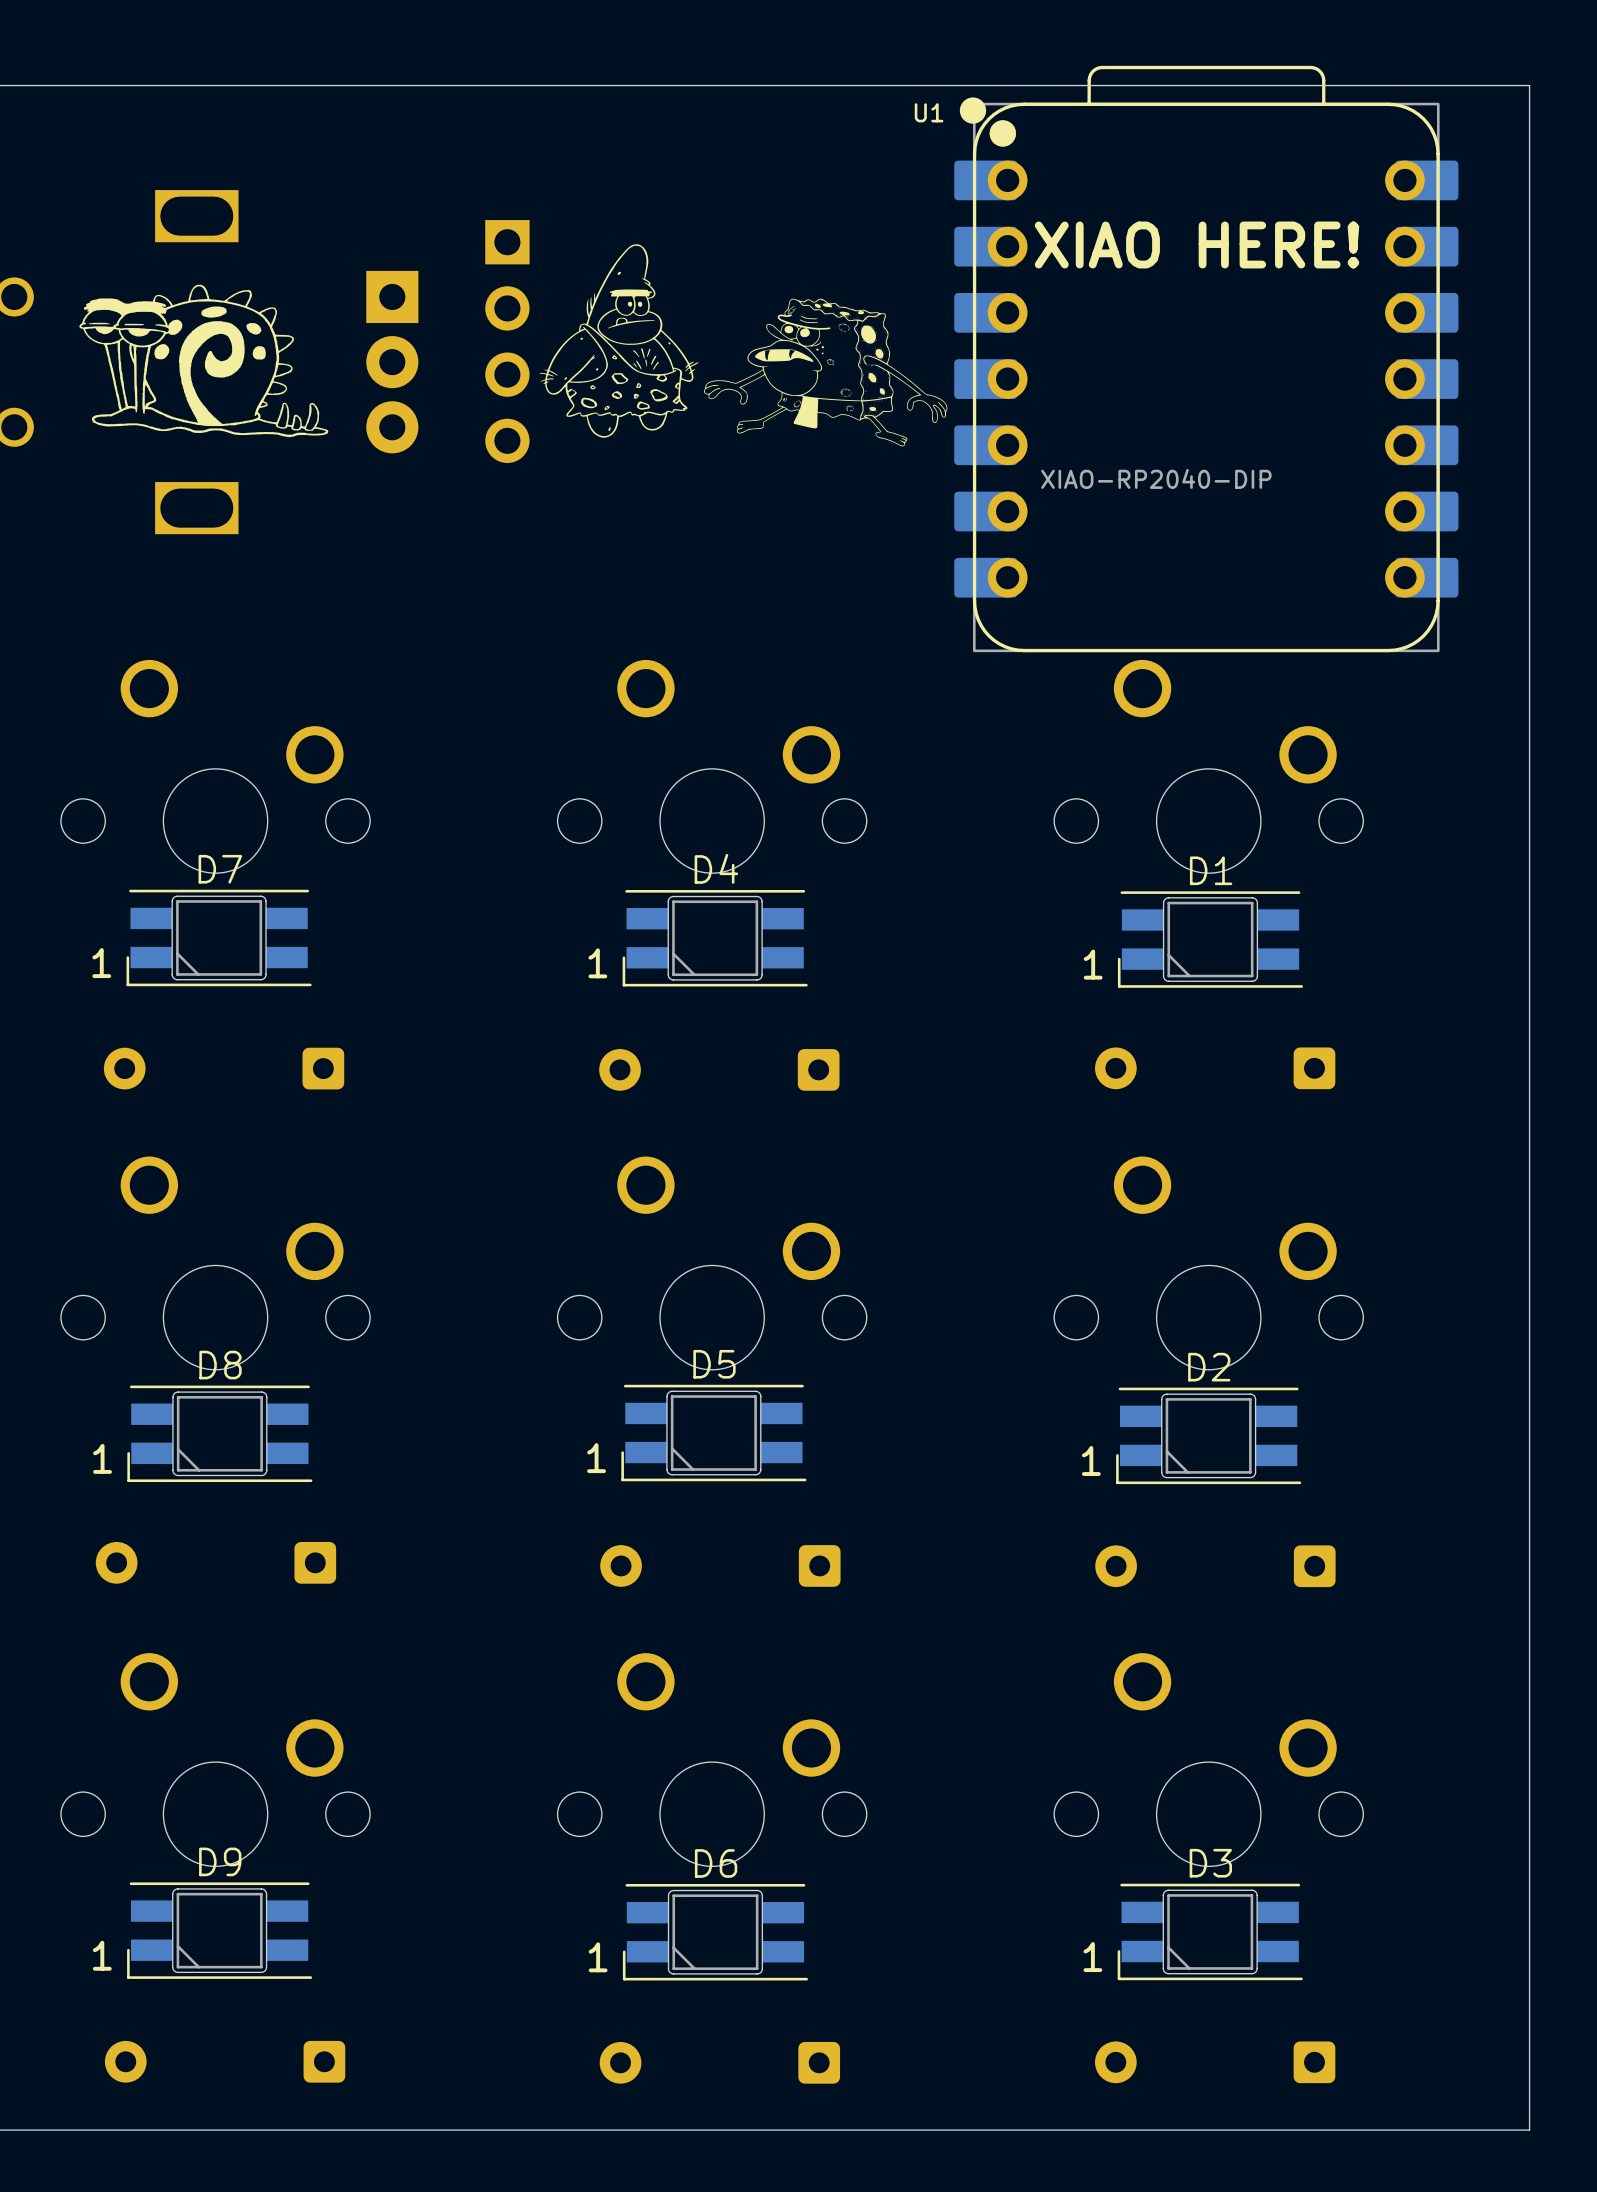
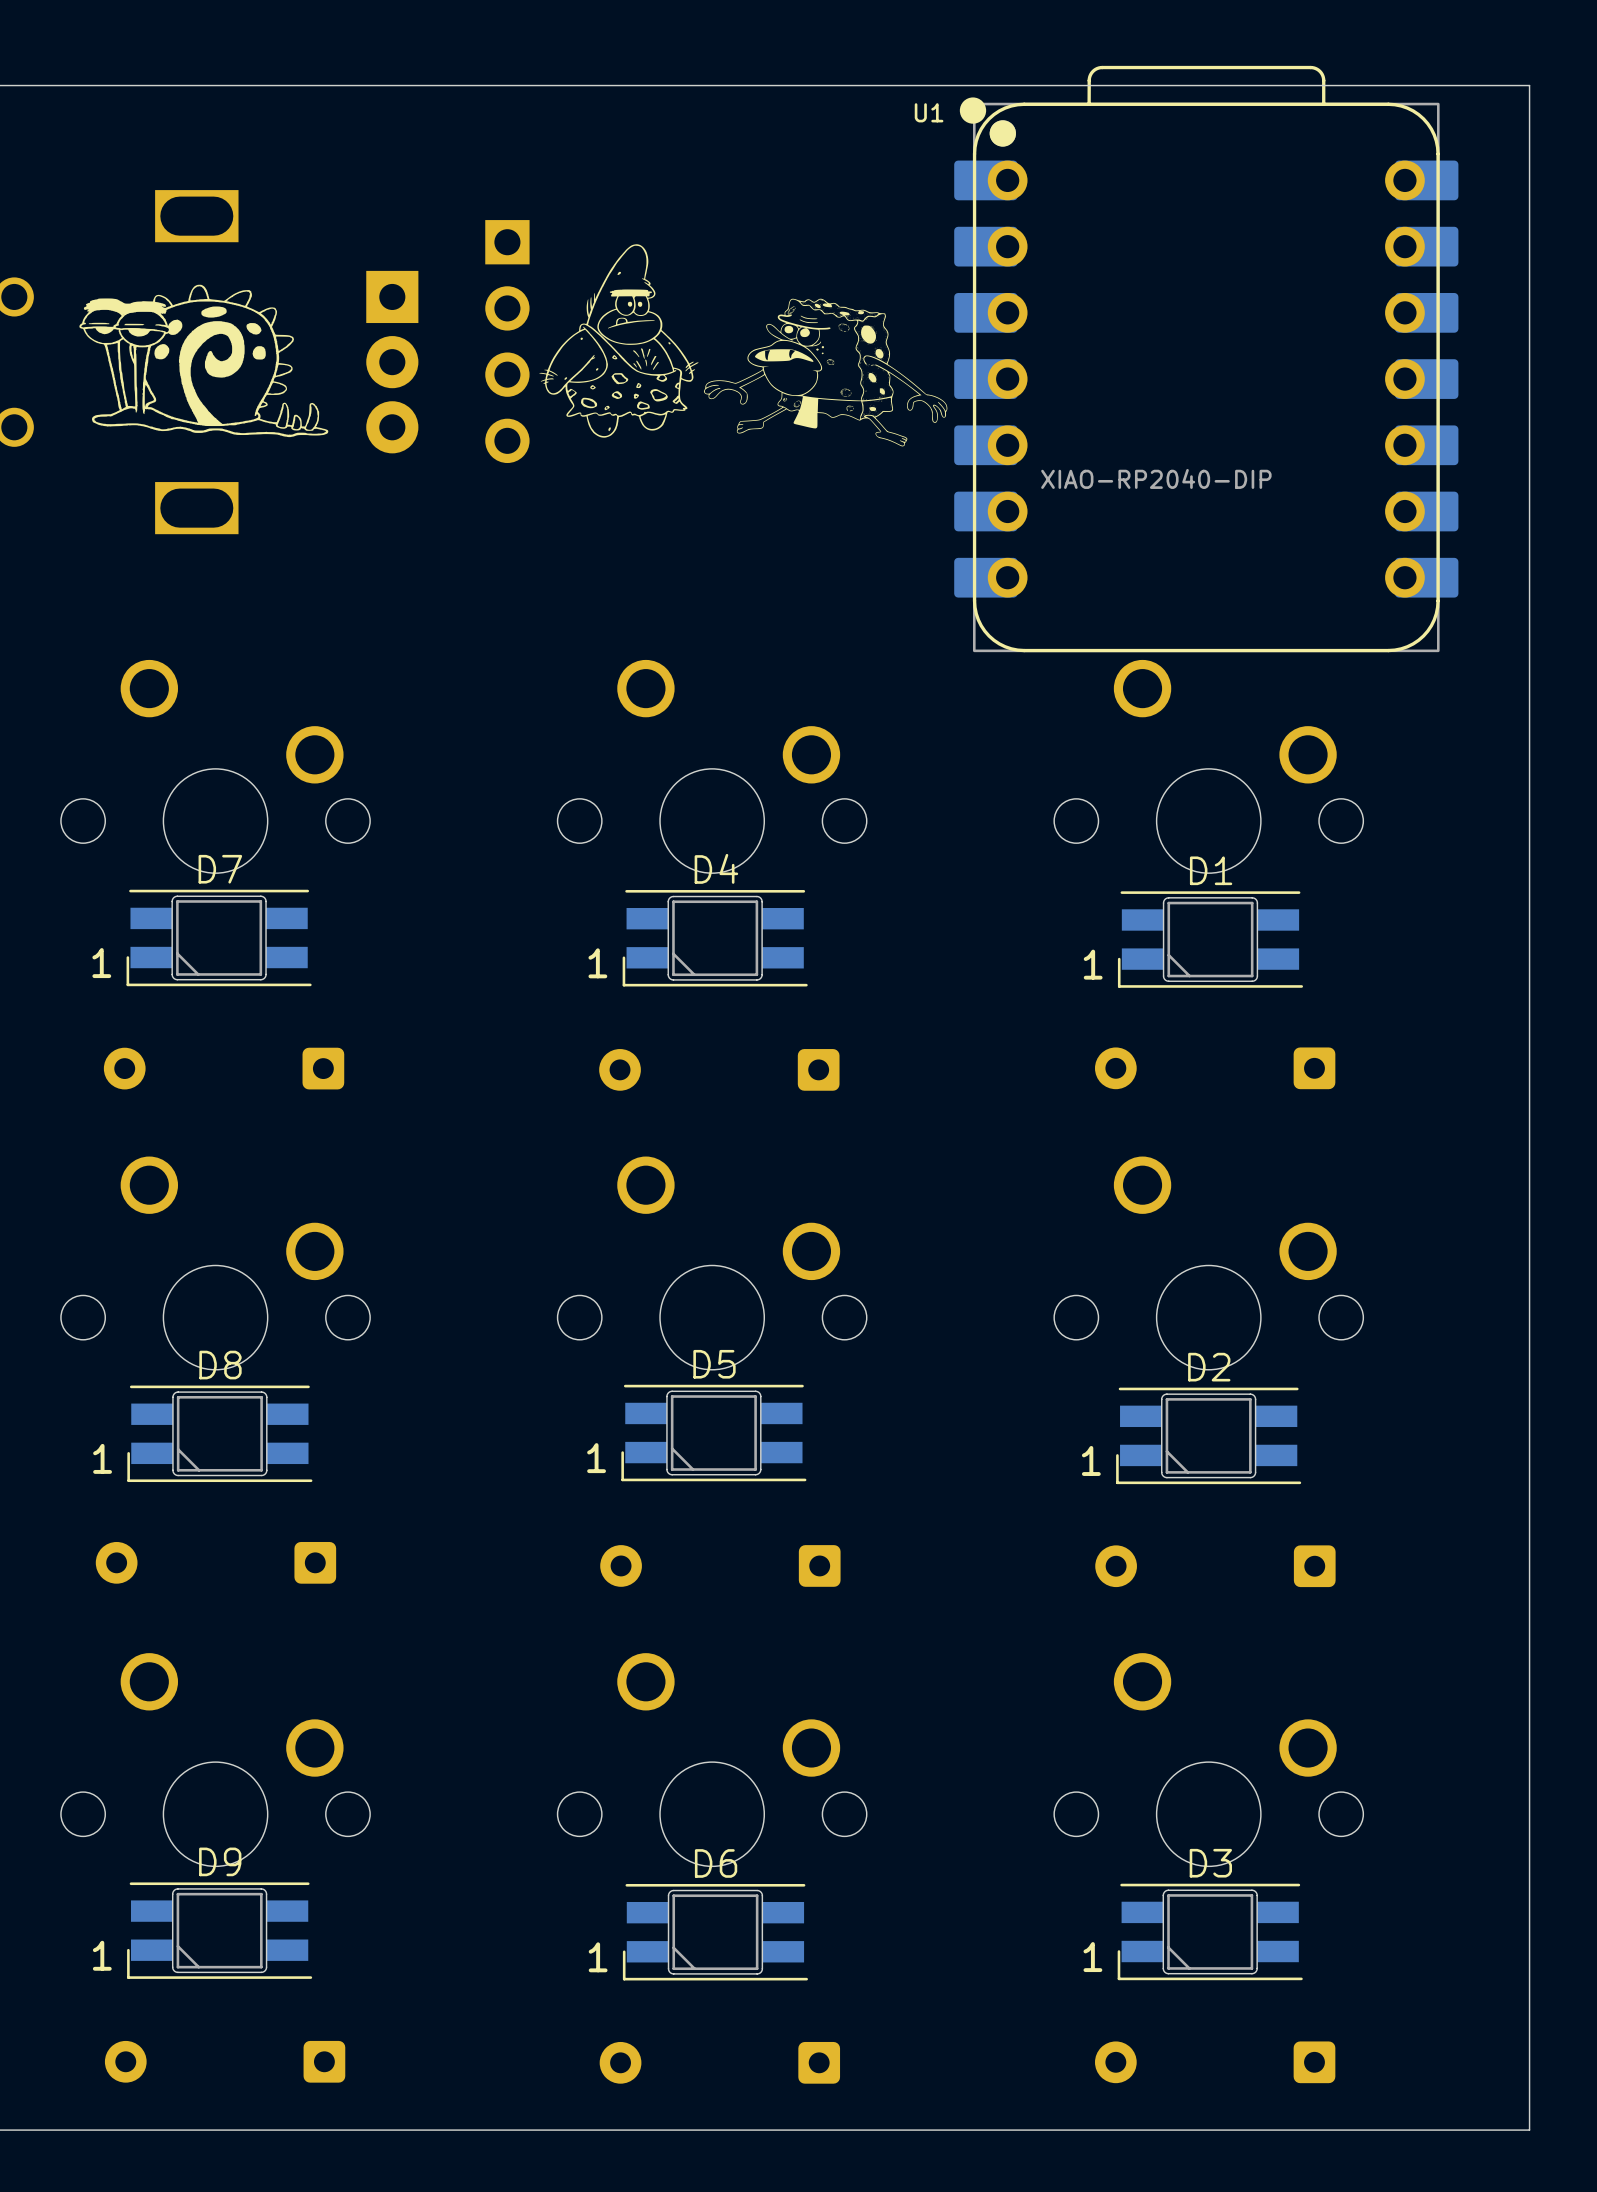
text: XIAO HERE! (1197, 244) -> none

